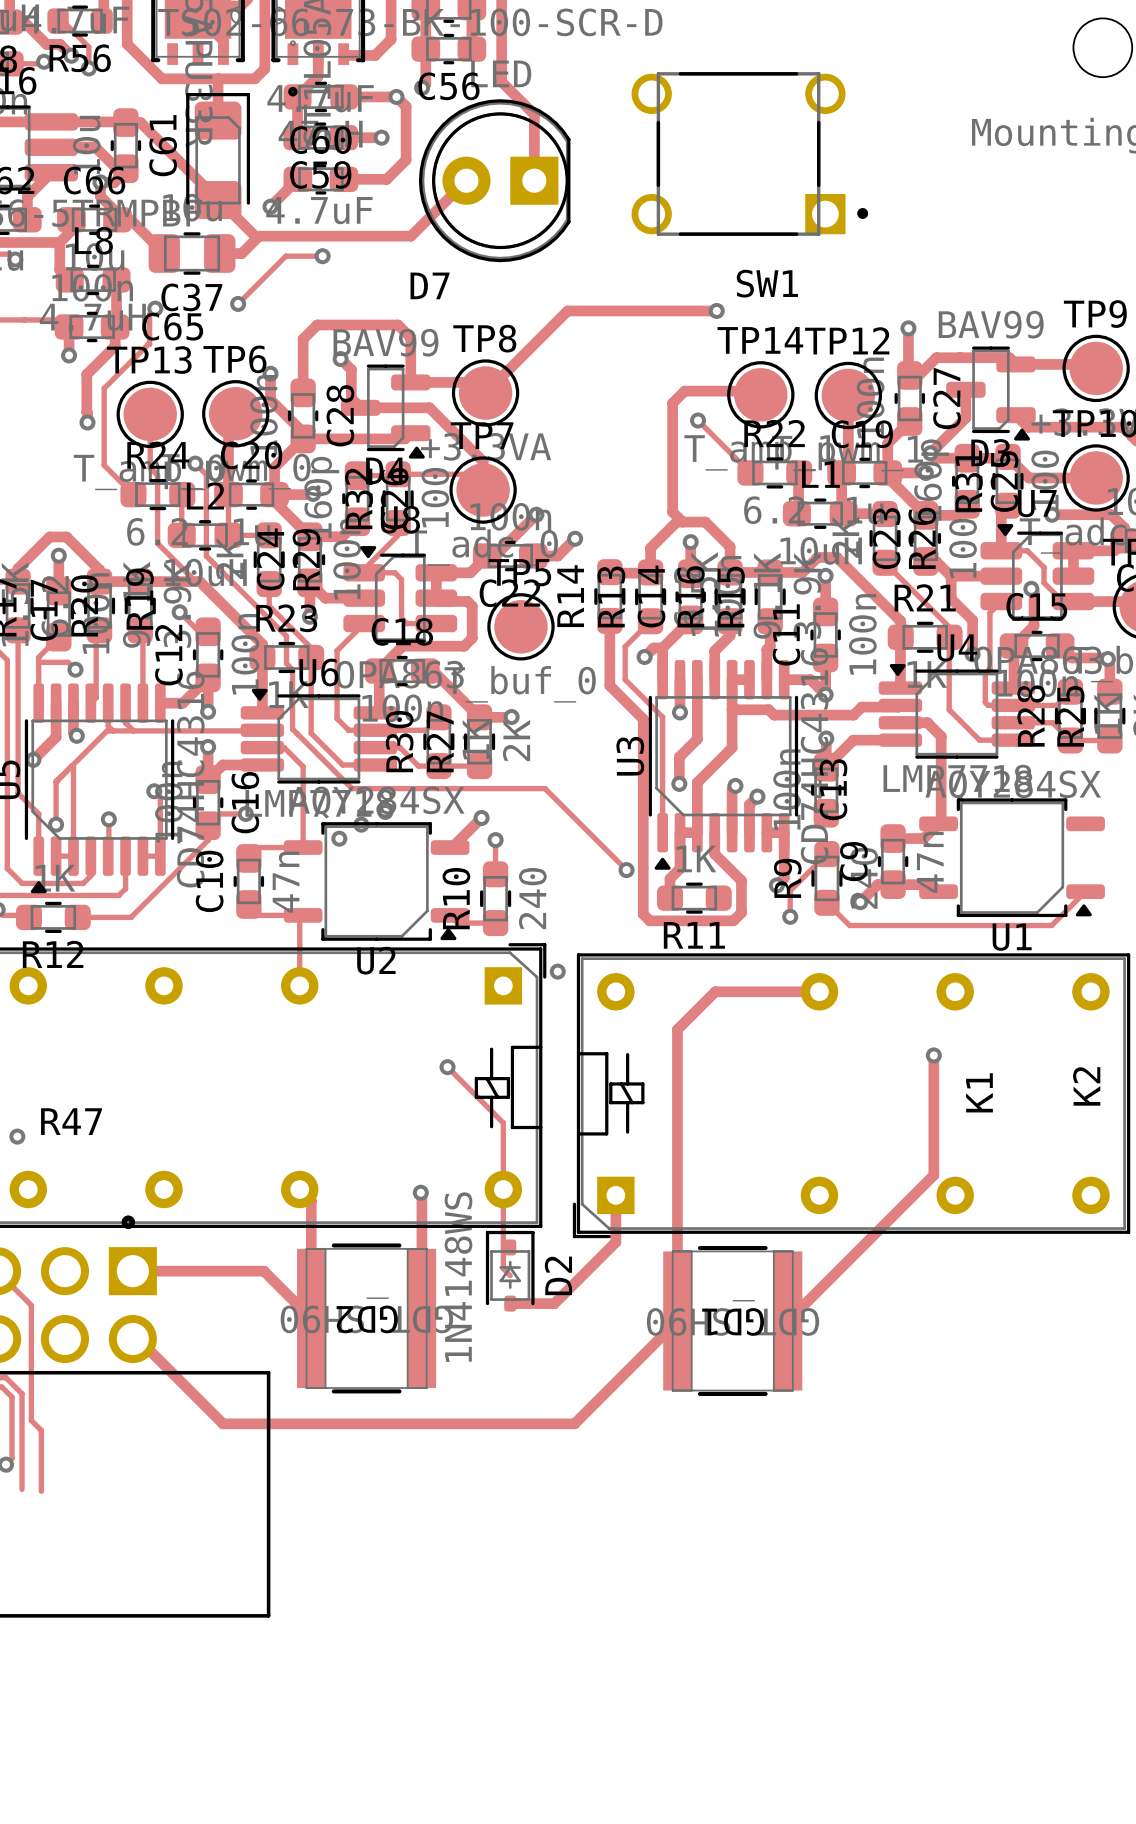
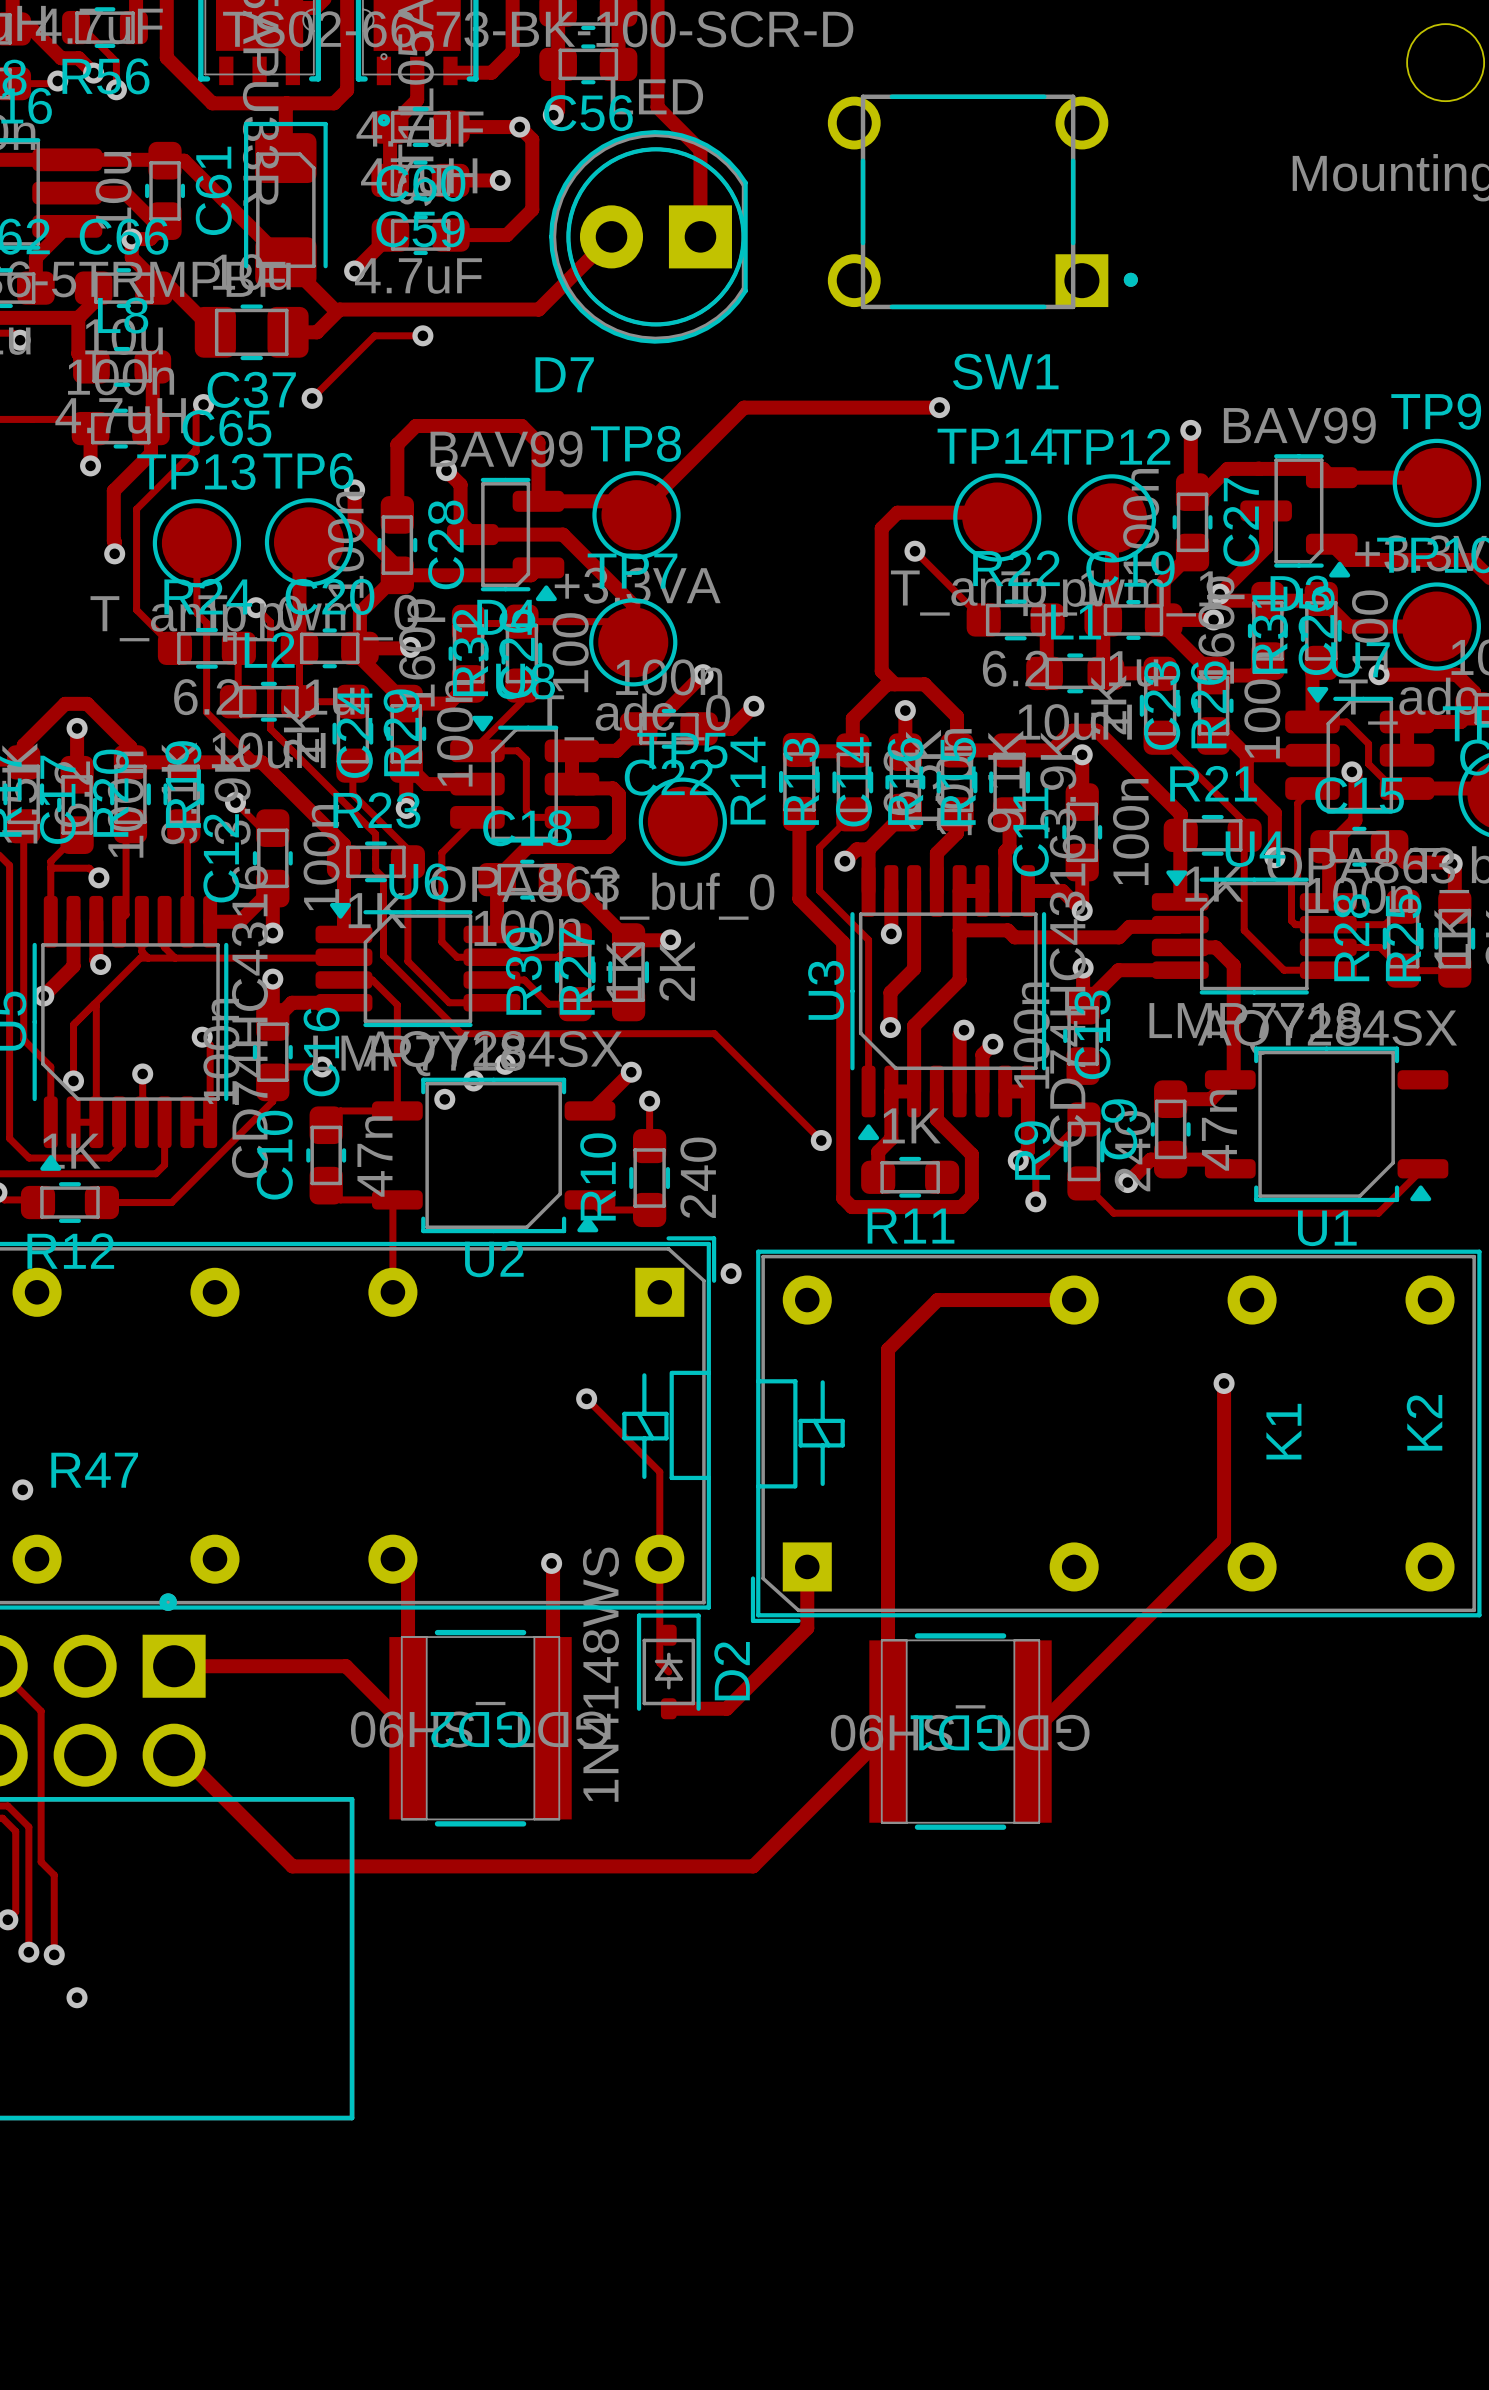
via: none -> (28, 1952)
via: none -> (54, 1954)
via: none -> (77, 1997)

